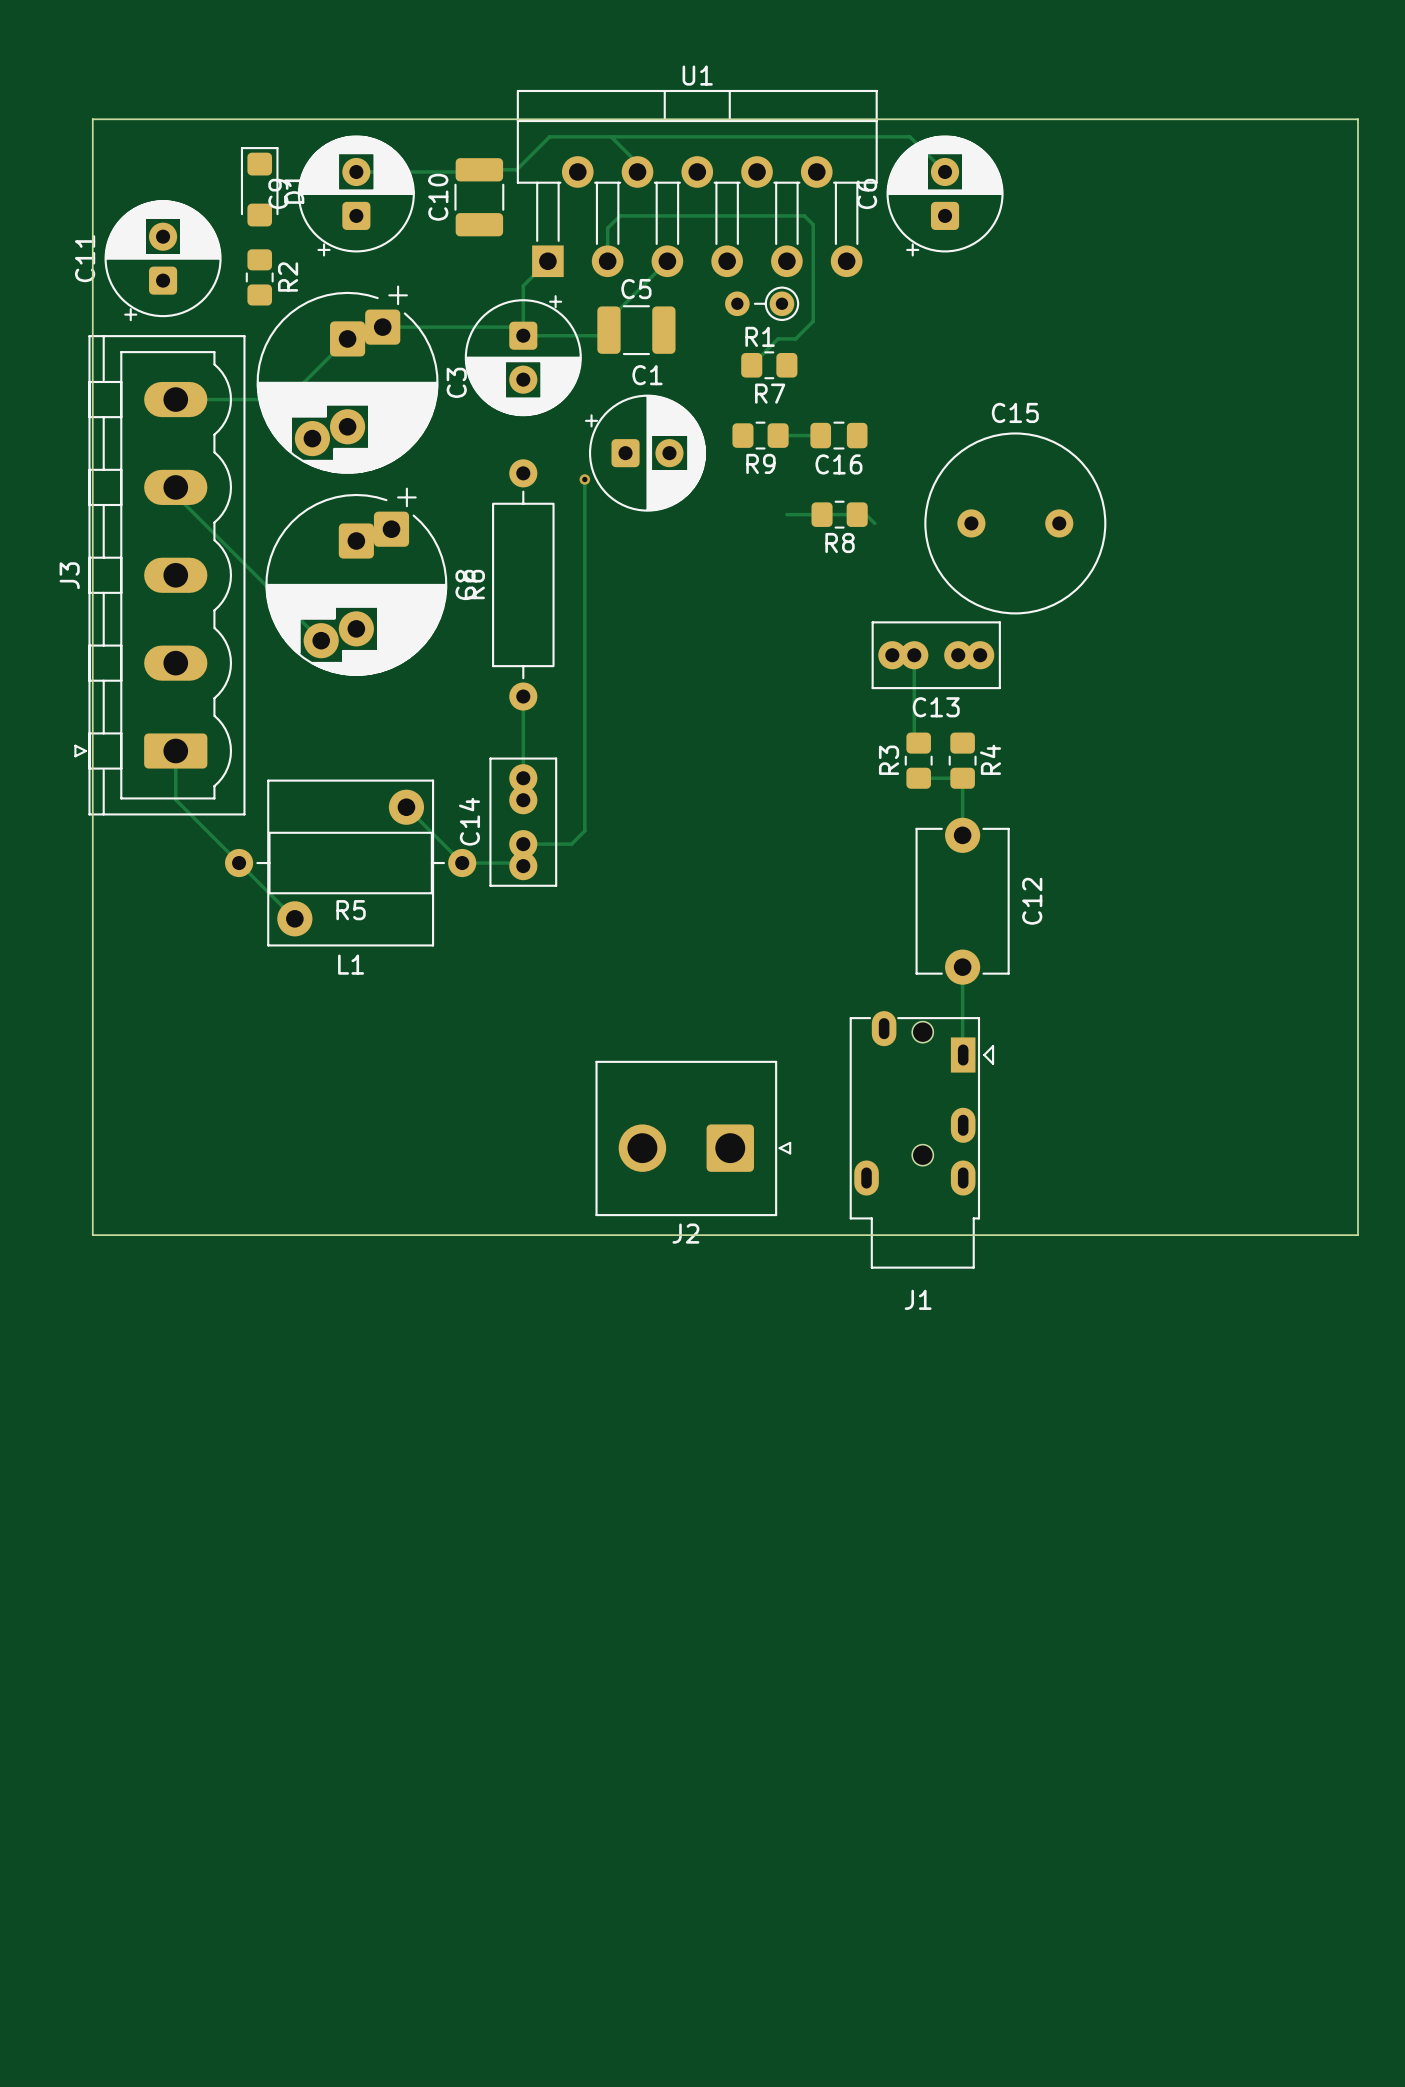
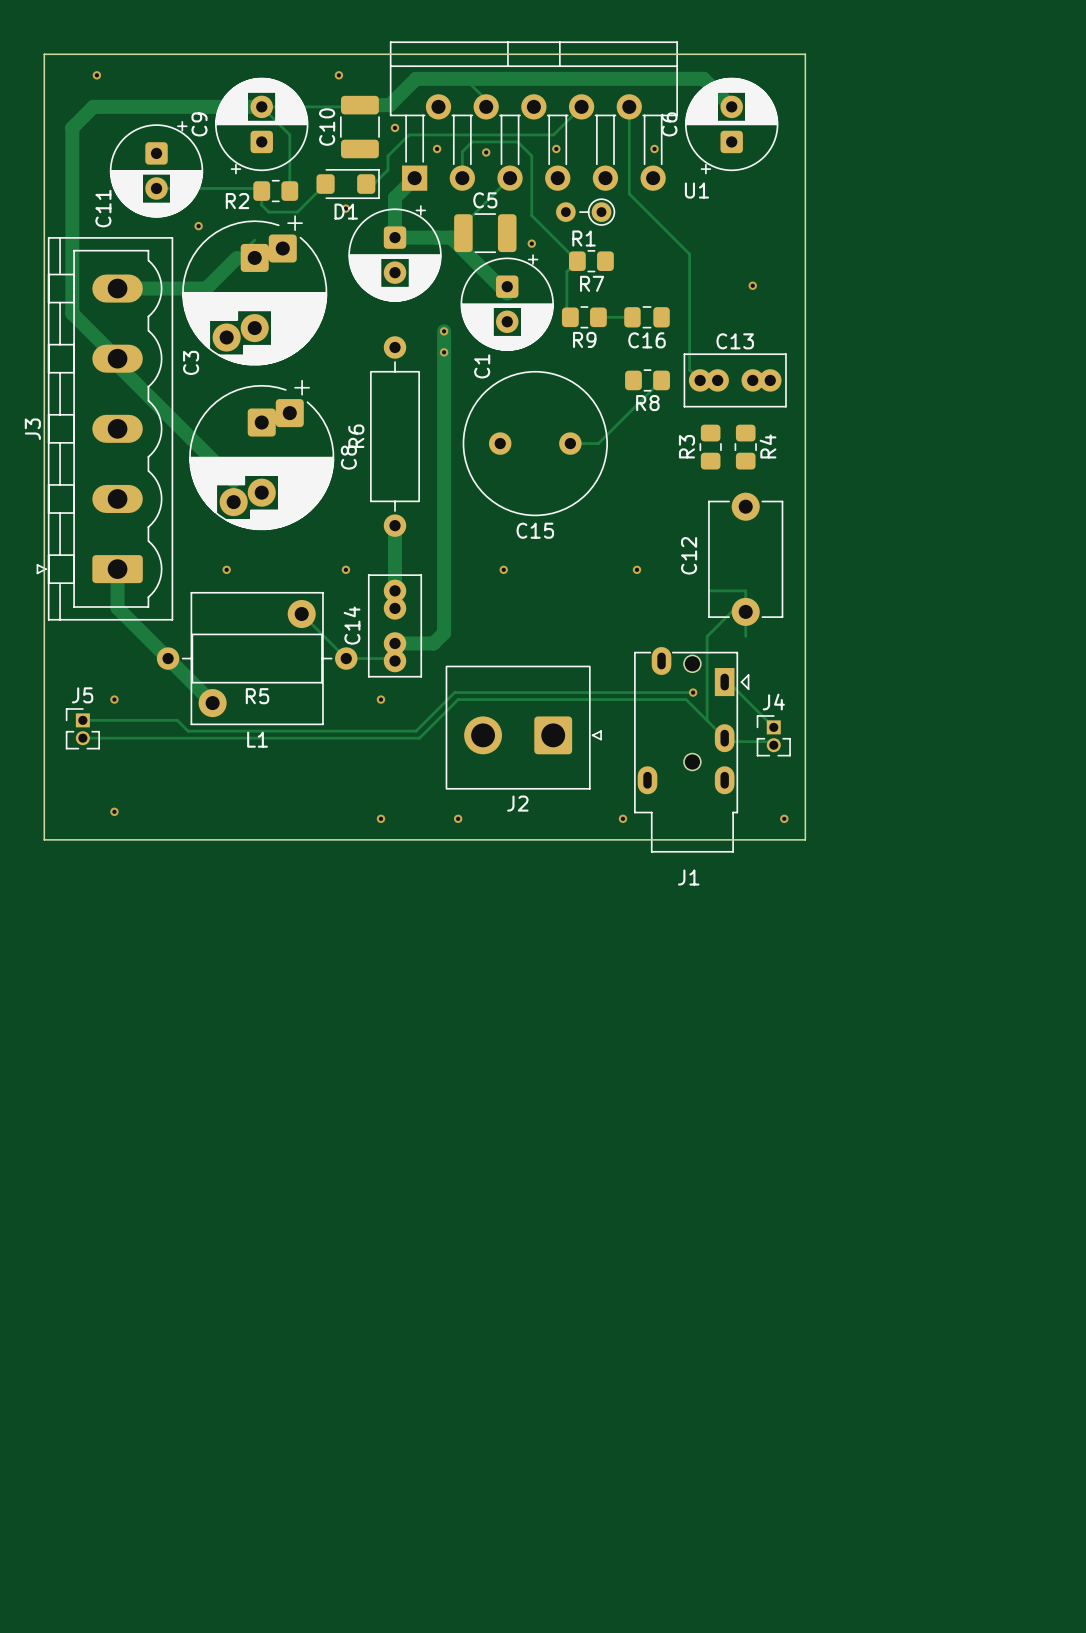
U1 name position: U1 (697, 75) -> U1 (696, 190)
board edge: (92, 119) (92, 1235) (1358, 1235) (1358, 119) (92, 119) -> (44, 54) (44, 839) (805, 839) (805, 54) (44, 54)
via: none -> (96, 75)
via: none -> (338, 75)
track width: thin (479, 169) (516, 169) (549, 136) (909, 136) (945, 171) -> thick (359, 105) (389, 105) (416, 78) (703, 78) (731, 106)
track: none -> (581, 106) (553, 134) (409, 134) (387, 155) (387, 170) (373, 184) (366, 184)
track: none -> (629, 106) (629, 193) (689, 254) (689, 369) (700, 380)
D1 rotation: 0° (259, 186) -> 90° clockwise (348, 184)
D1 position: (259, 186) -> (348, 184)
via: none -> (395, 127)
track: (677, 215) (804, 215) (813, 224) (813, 321) (795, 338) (778, 338) (751, 365) -> (517, 141) (531, 155) (531, 215) (577, 261) (566, 271) (566, 313) (570, 317)
via: none -> (437, 148)
via: none -> (556, 148)
via: none -> (654, 148)
via: none -> (486, 152)
C11 name position: C11 (85, 258) -> C11 (103, 208)
C11 rotation: 0° (163, 260) -> 180° (156, 169)
track width: thin (547, 261) (523, 285) (523, 335) (603, 335) -> thick (414, 178) (395, 197) (395, 237) (458, 237)
track: none -> (325, 184) (297, 212) (268, 212) (261, 205) (261, 191) (259, 188) (156, 188)
track: none -> (289, 190) (289, 134) (261, 106) (93, 106) (72, 127) (72, 313) (117, 358)
R2 rotation: 0° (259, 277) -> 90° clockwise (275, 191)
R2 position: (259, 277) -> (275, 191)
R2 name position: R2 (288, 277) -> R2 (237, 201)
via: none -> (345, 208)
via: none -> (198, 226)
track: (382, 327) (514, 327) -> none
track: none -> (451, 237) (507, 293)
via: none -> (531, 243)
track width: thin (325, 361) (286, 399) (175, 399) -> thick (236, 257) (206, 288) (117, 288)
C1 name position: C1 (647, 375) -> C1 (482, 366)
C3 position: (347, 379) -> (254, 290)
C3 name position: C3 (456, 382) -> C3 (191, 362)
via: none -> (752, 285)
C15 name position: C15 (1015, 412) -> C15 (535, 530)
track: none -> (444, 331) (444, 352)
via: none -> (444, 331)
C1 rotation: 0° (645, 453) -> 90° clockwise (507, 302)
track width: thin (584, 479) (584, 830) (571, 844) (523, 844) -> thick (444, 352) (444, 632) (433, 643) (395, 643)
track width: thin (175, 495) (321, 640) -> thick (117, 364) (233, 481)
track: (786, 514) (865, 514) (874, 523) -> none
track: none -> (661, 380) (598, 443) (570, 443)
C15 position: (1015, 523) -> (535, 443)
C8 position: (356, 581) -> (261, 455)
track: (914, 655) (914, 738) (918, 743) -> none
C13 position: (936, 655) -> (735, 380)
track width: thin (523, 696) (523, 778) -> thick (395, 525) (395, 590)
C13 name position: C13 (936, 707) -> C13 (735, 341)
track width: thin (175, 751) (175, 799) (294, 918) -> thick (117, 569) (117, 608) (212, 703)
via: none -> (226, 569)
via: none -> (345, 569)
via: none -> (503, 569)
via: none -> (637, 569)
R3 position: (918, 760) -> (710, 447)
R4 position: (962, 760) -> (745, 447)
track: none -> (745, 611) (731, 611) (707, 636) (707, 720)
track: none -> (724, 682) (728, 682) (773, 727)
C12 position: (962, 901) -> (745, 559)
C12 name position: C12 (1032, 901) -> C12 (689, 555)
track: none -> (693, 692) (454, 692) (416, 731) (188, 731) (177, 720) (82, 720)
via: none -> (693, 692)
via: none -> (114, 699)
via: none -> (380, 699)
J5: none -> (82, 728)
J4: none -> (773, 735)
track: none -> (82, 738) (419, 738) (458, 699) (686, 699) (728, 741) (770, 741) (773, 745)
track: (962, 967) (963, 1055) -> none
via: none -> (114, 811)
via: none -> (380, 818)
via: none -> (458, 818)
via: none -> (622, 818)
via: none -> (784, 818)
J2 position: (693, 1138) -> (523, 727)
J1 position: (921, 1139) -> (691, 749)

